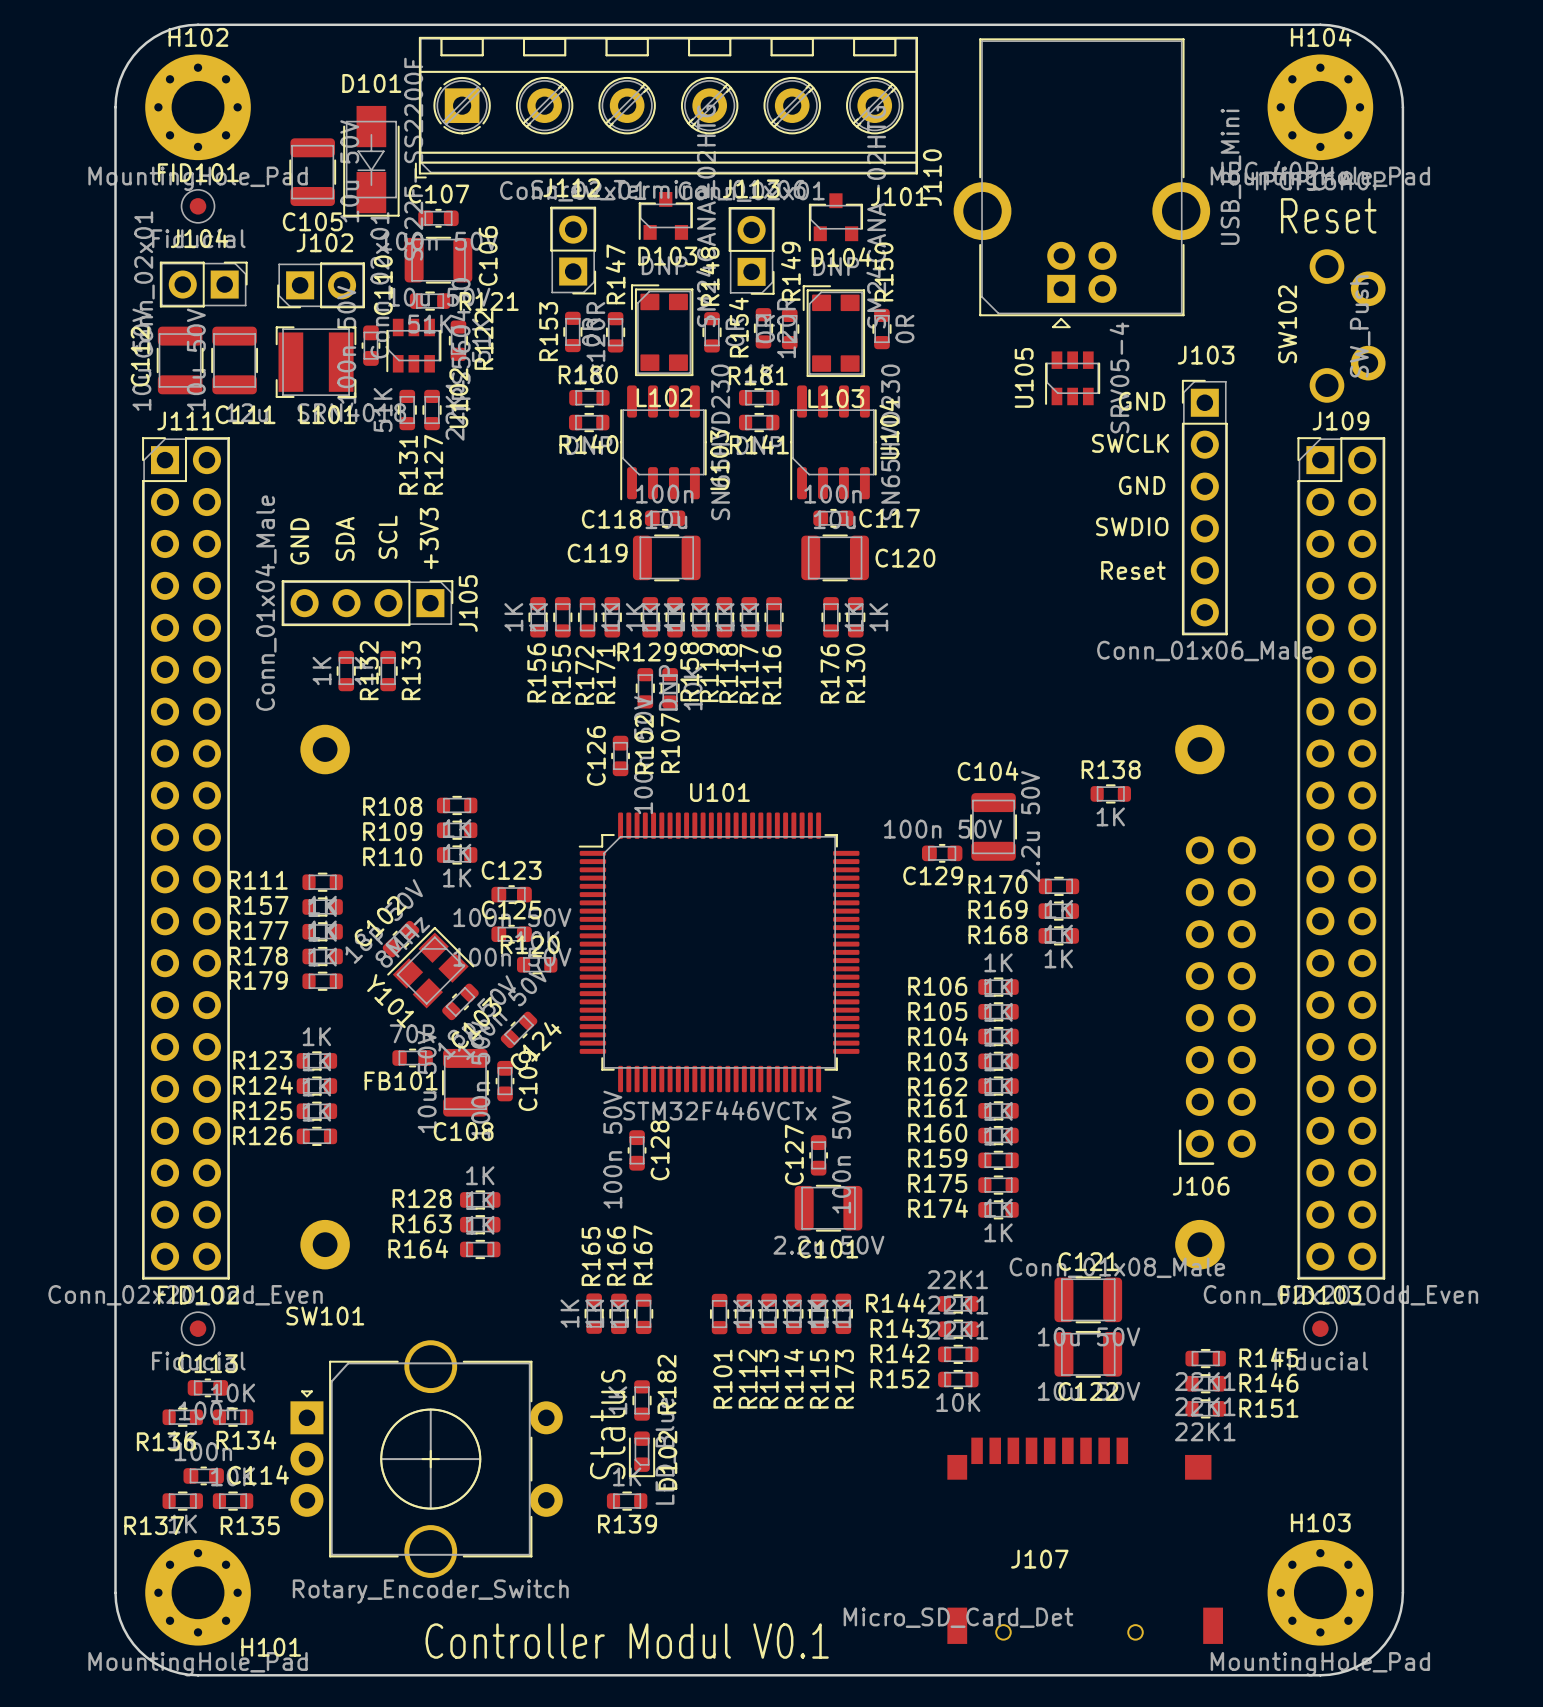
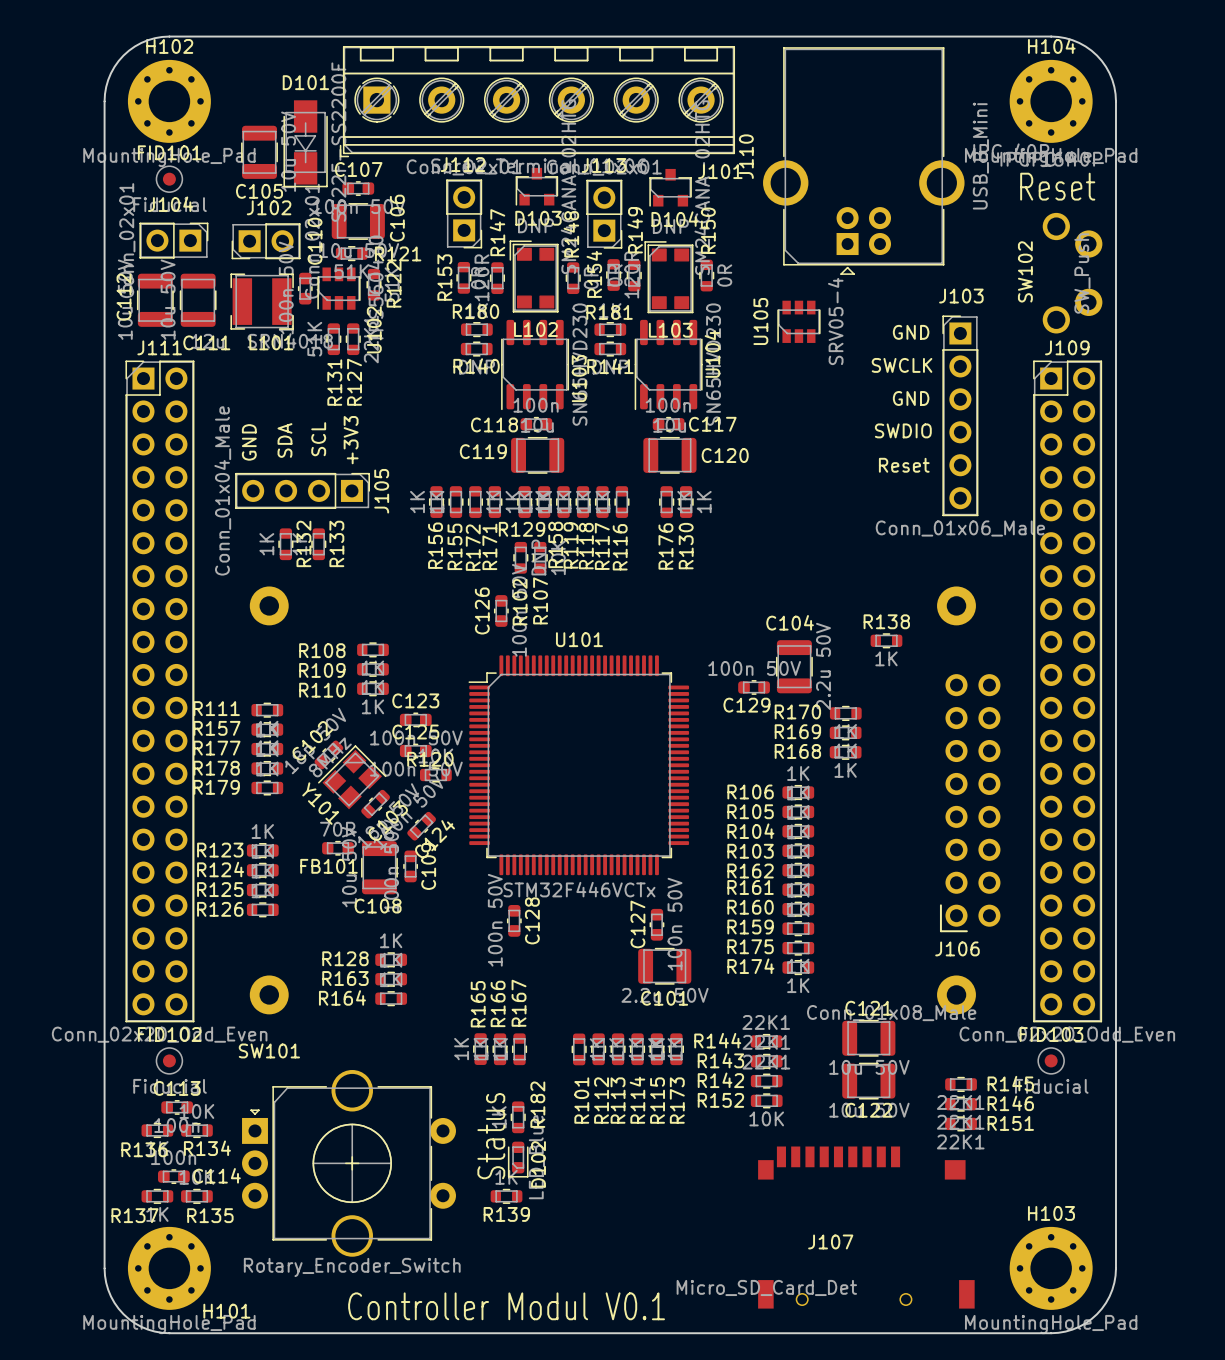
U105 position: (1072, 378) -> (798, 321)

